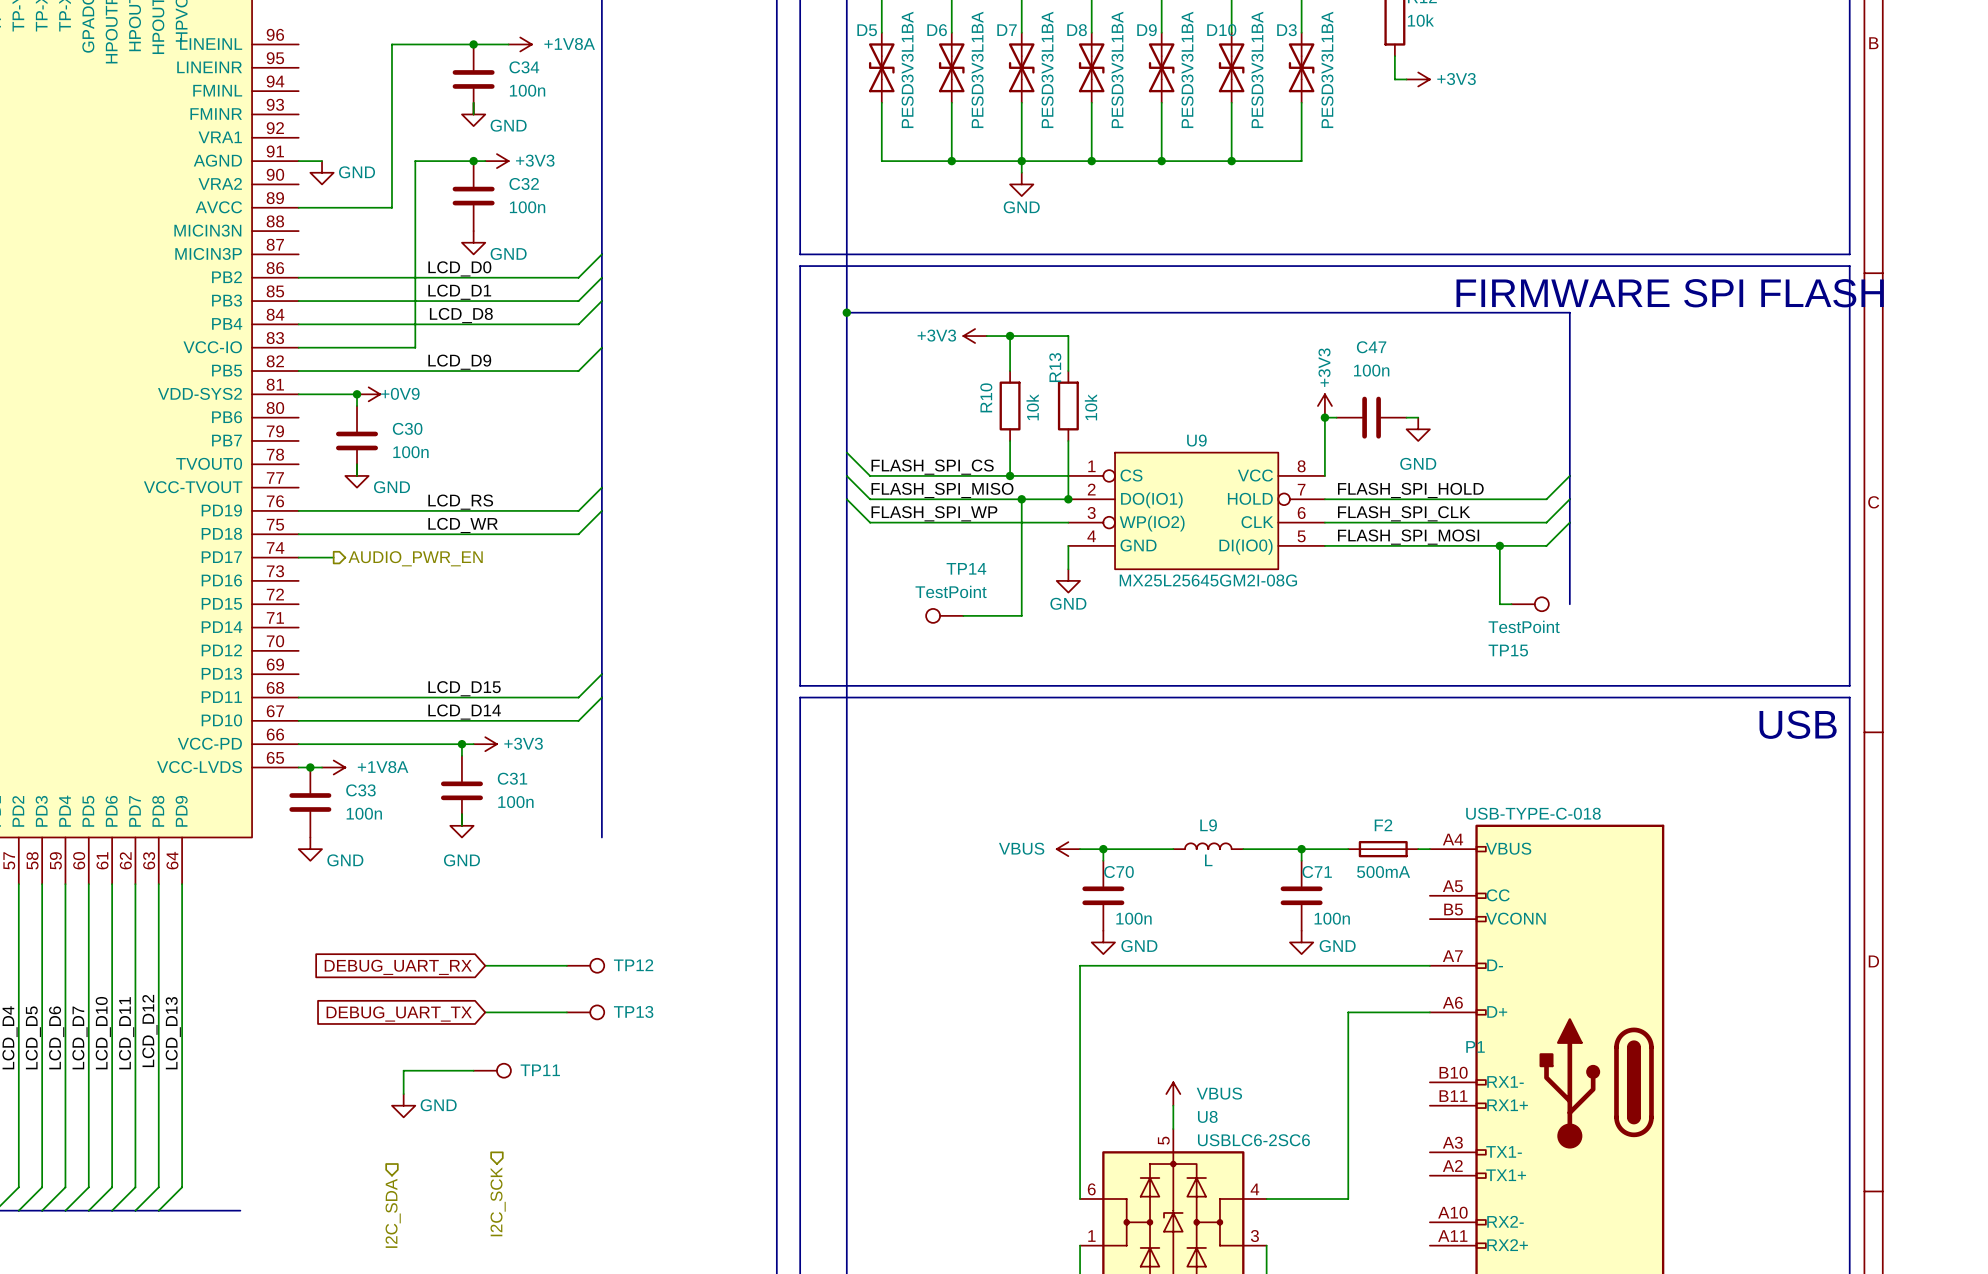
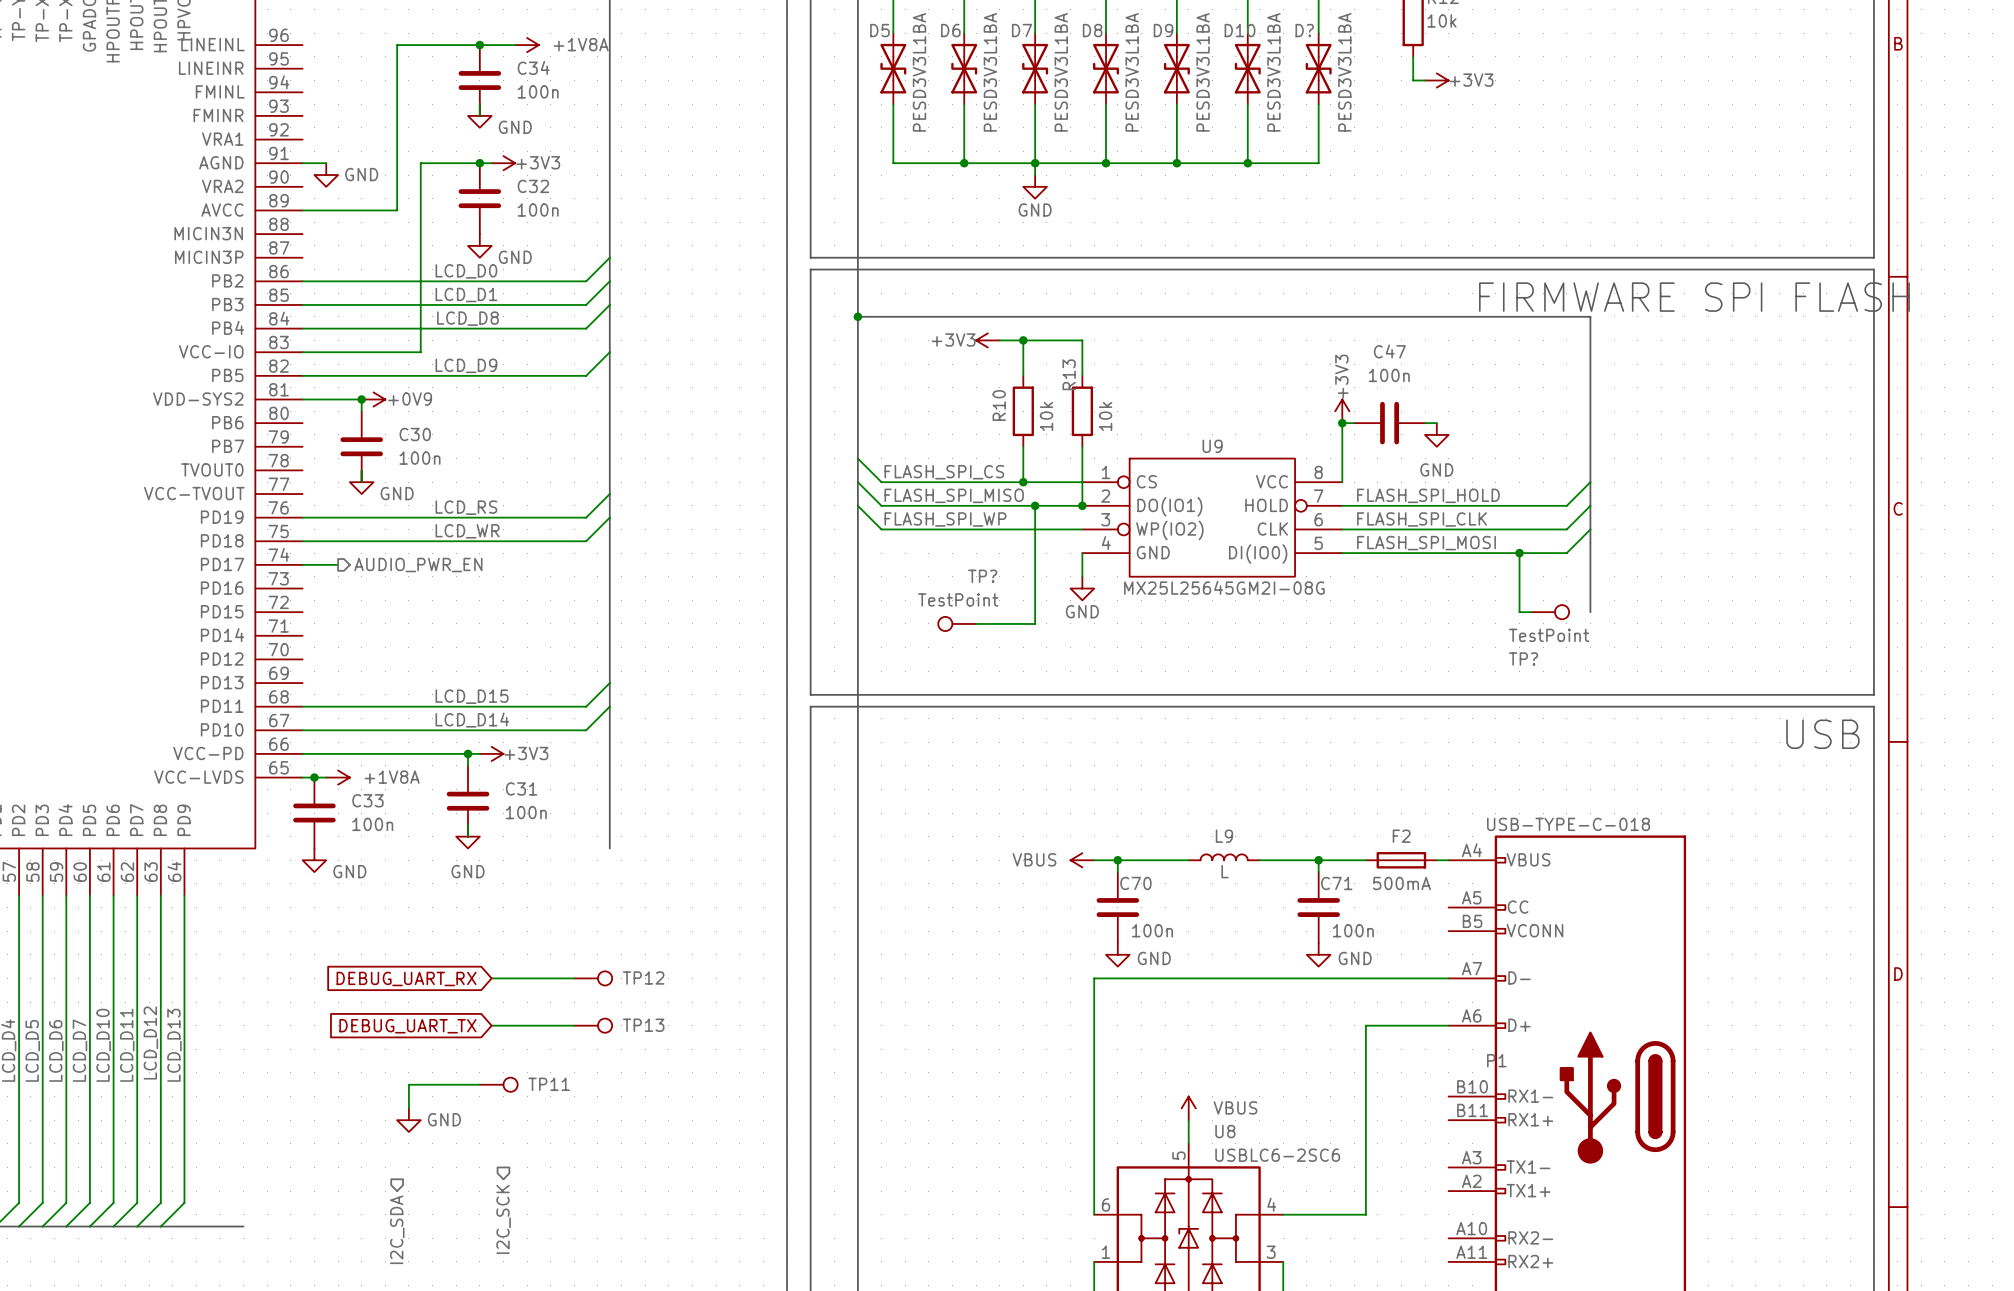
D3 name: D3 (1286, 30) -> D? (1304, 30)
TP14 name: TP14 (966, 568) -> TP? (982, 576)
TP15 name: TP15 (1508, 650) -> TP? (1523, 658)

